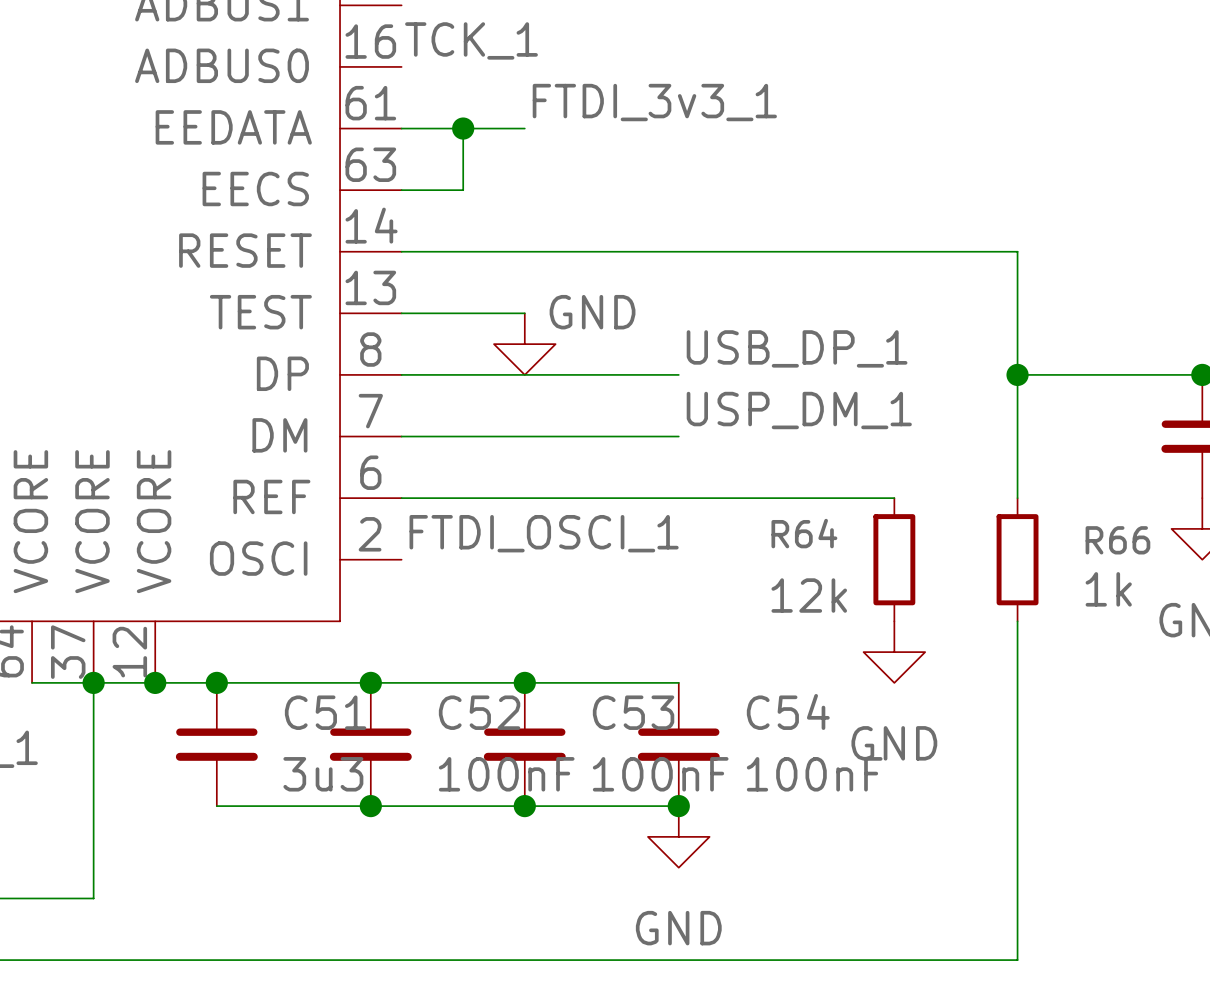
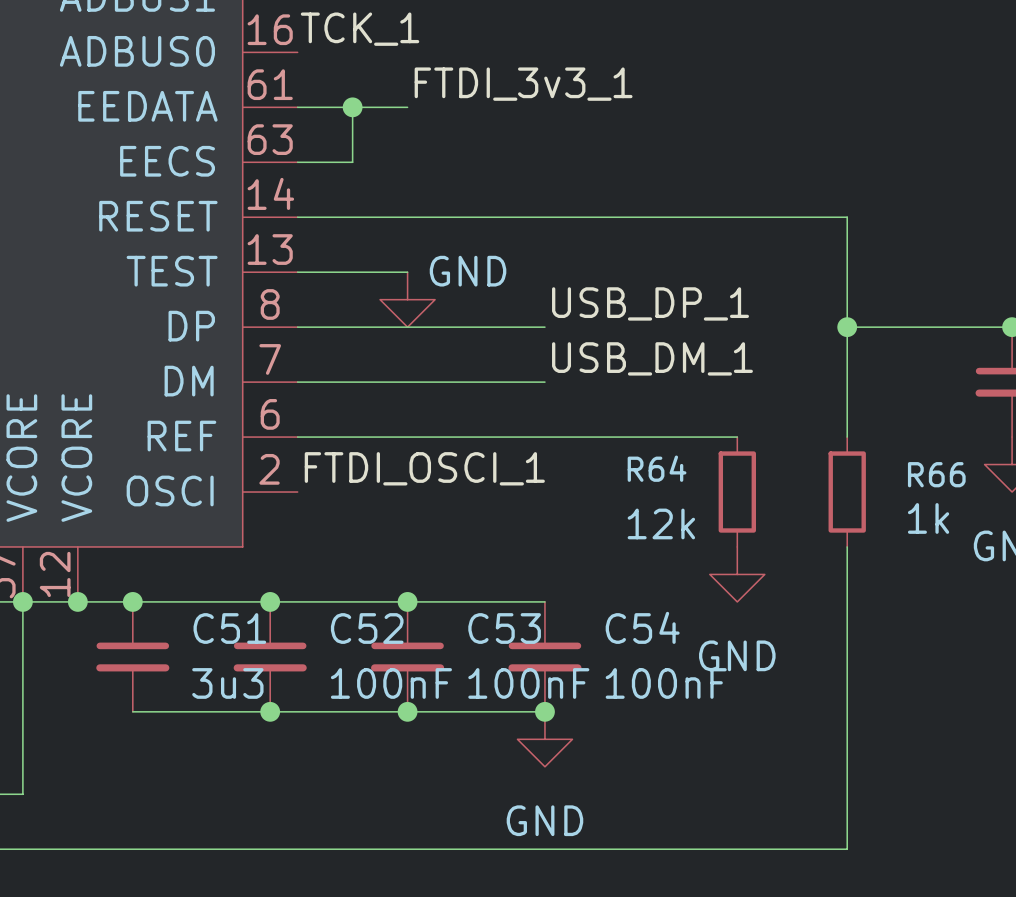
label: USP_DM_1 (799, 410) -> USB_DM_1 (652, 358)

